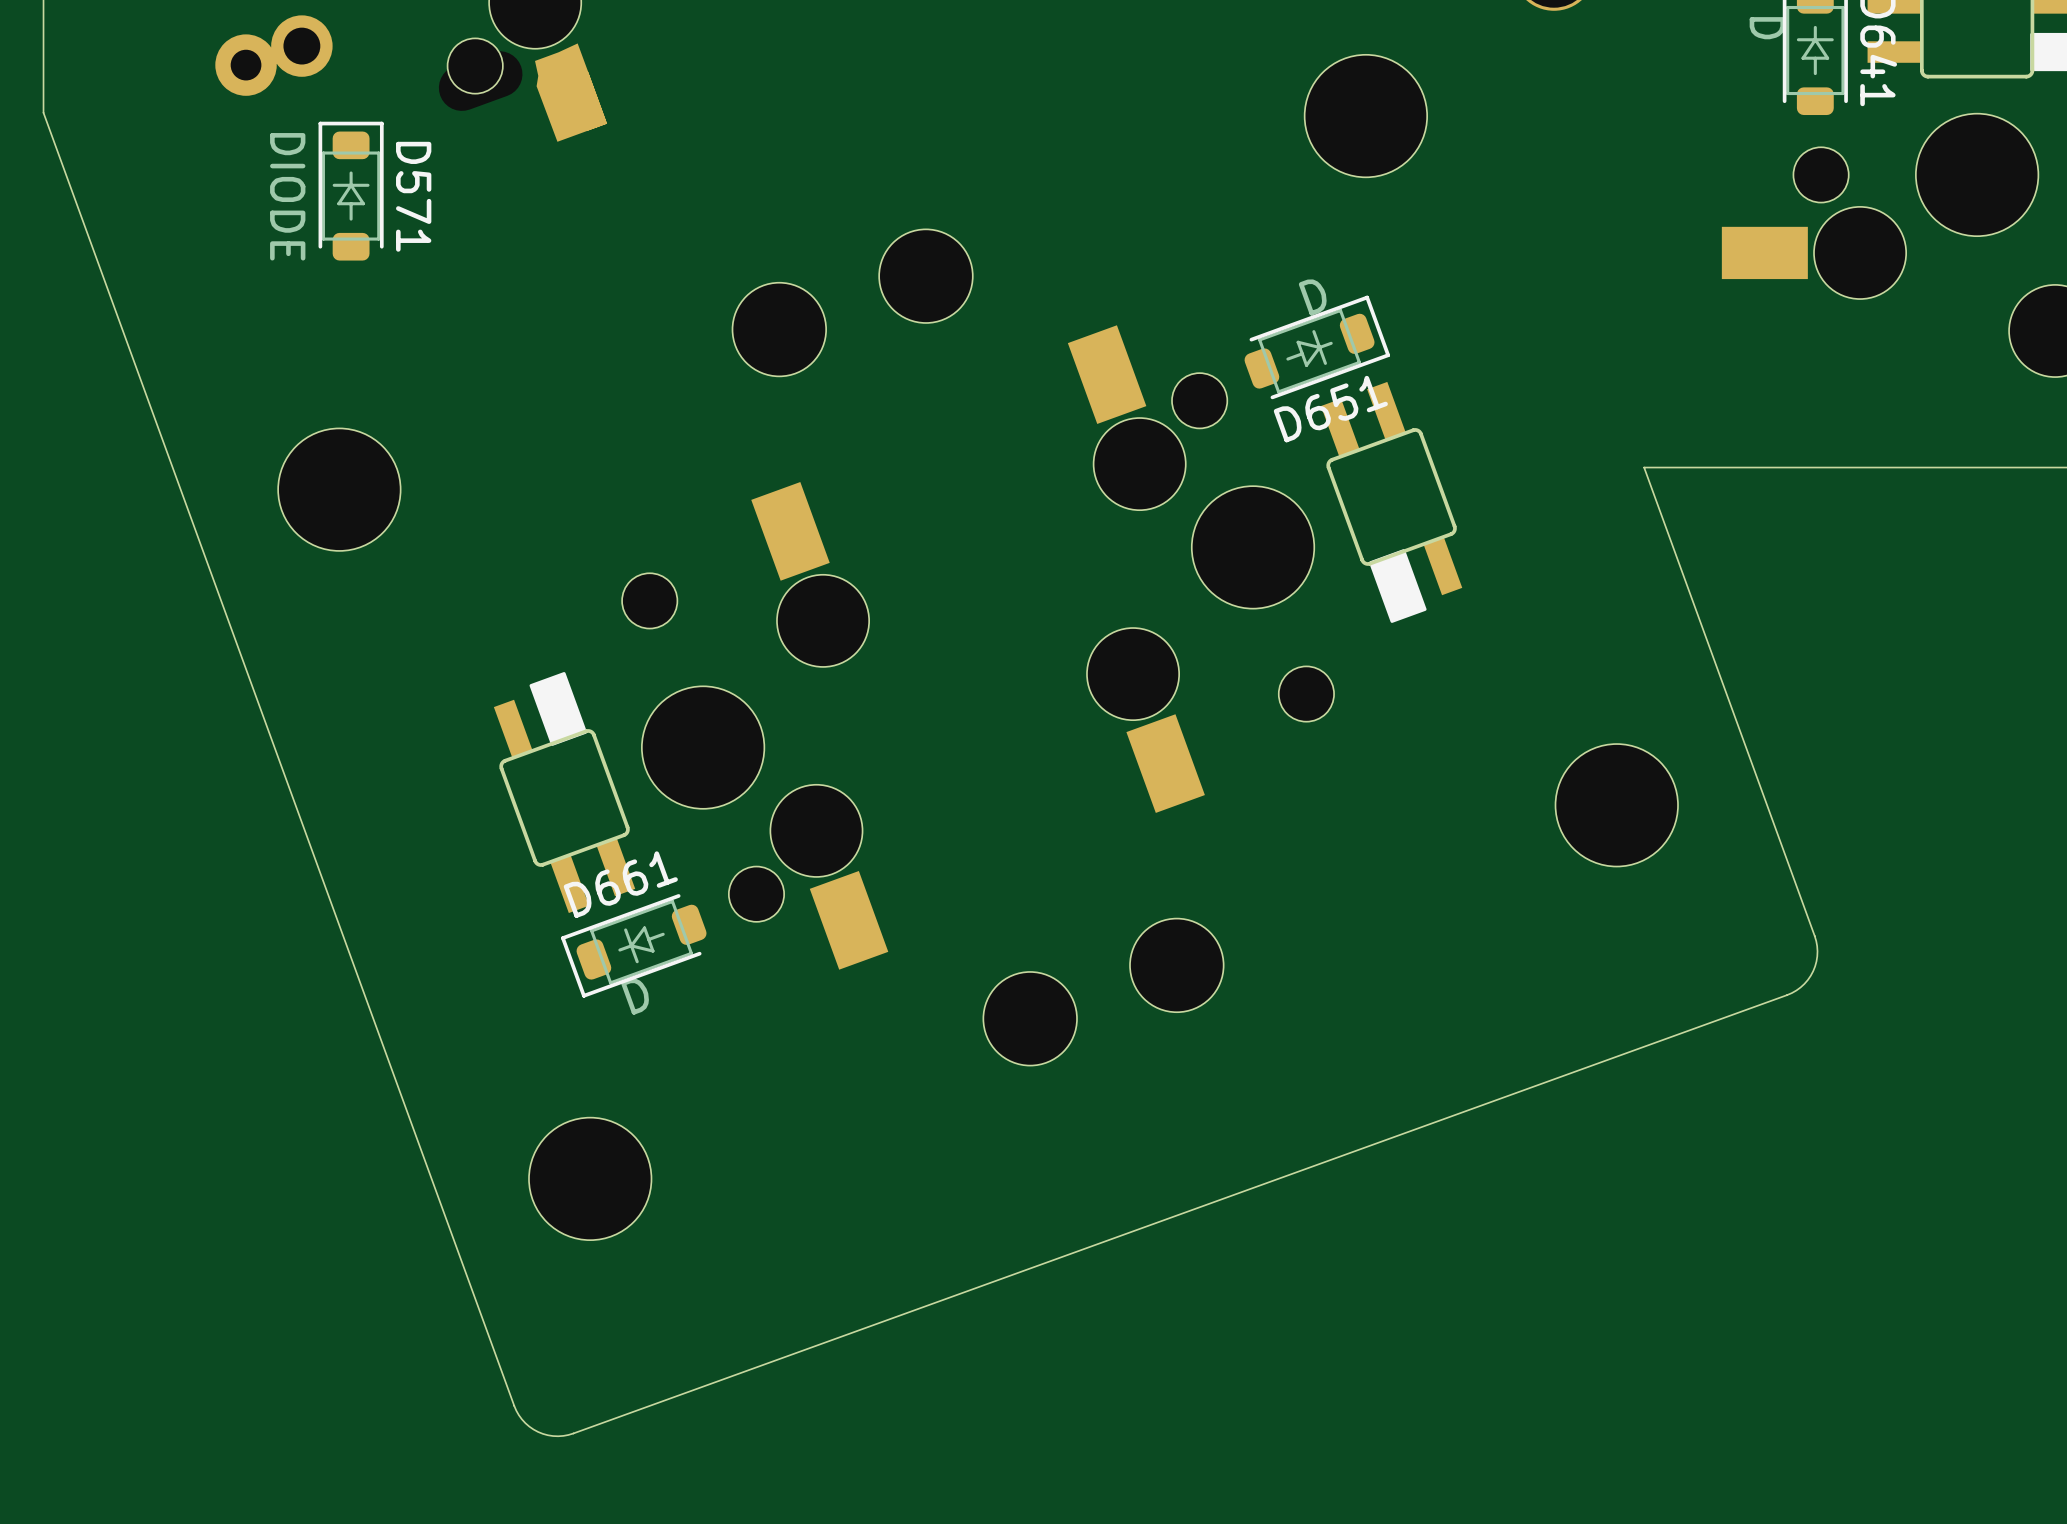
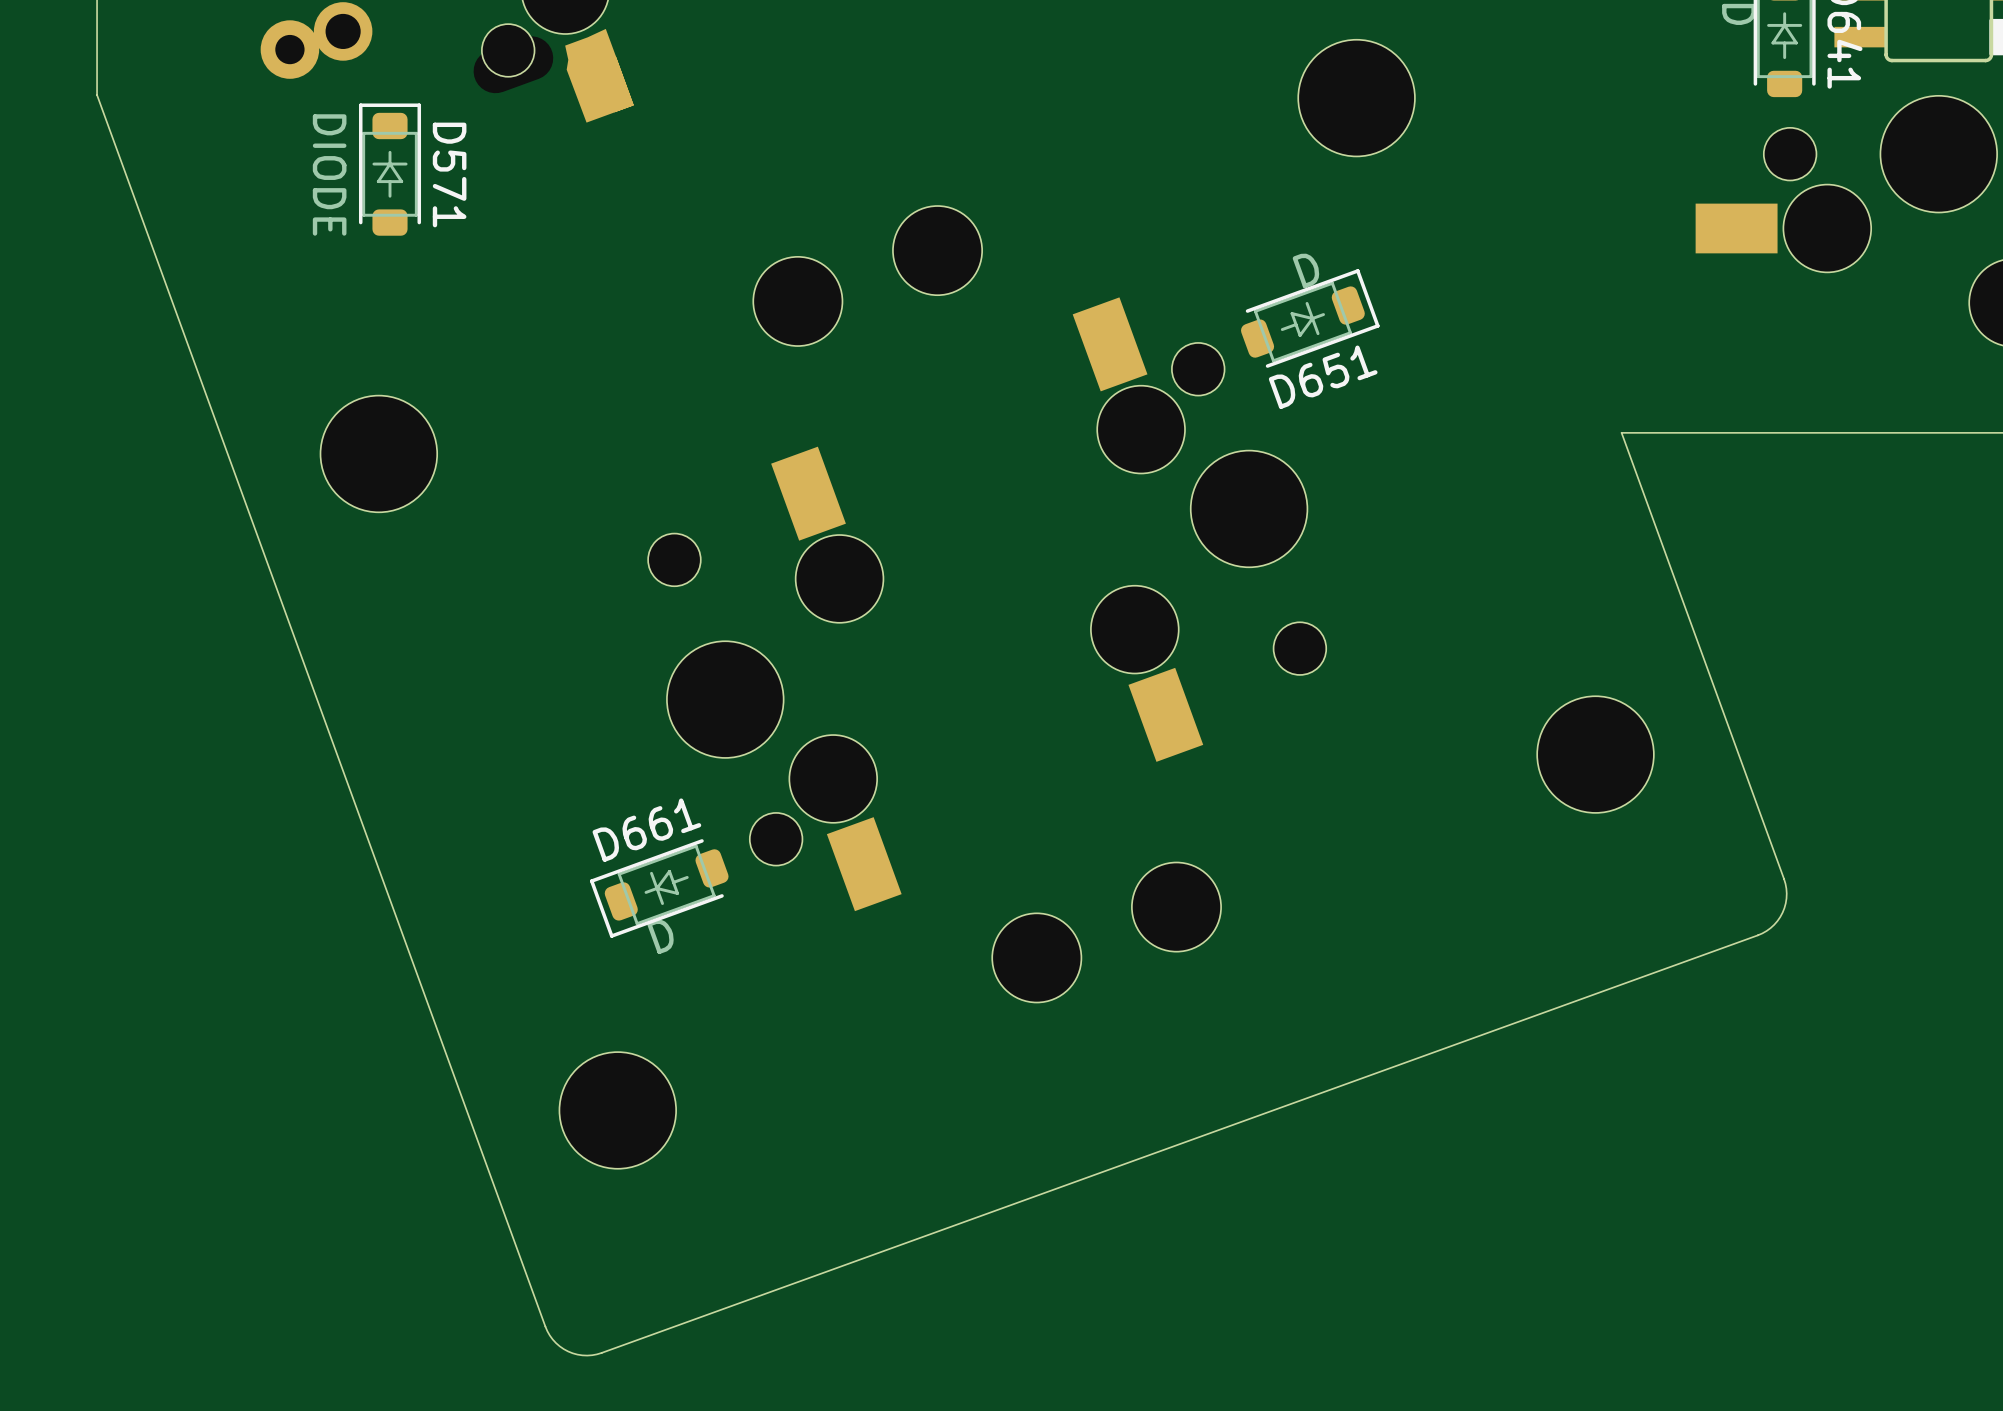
part: (1391, 502) -> none
part: (564, 792) -> none

